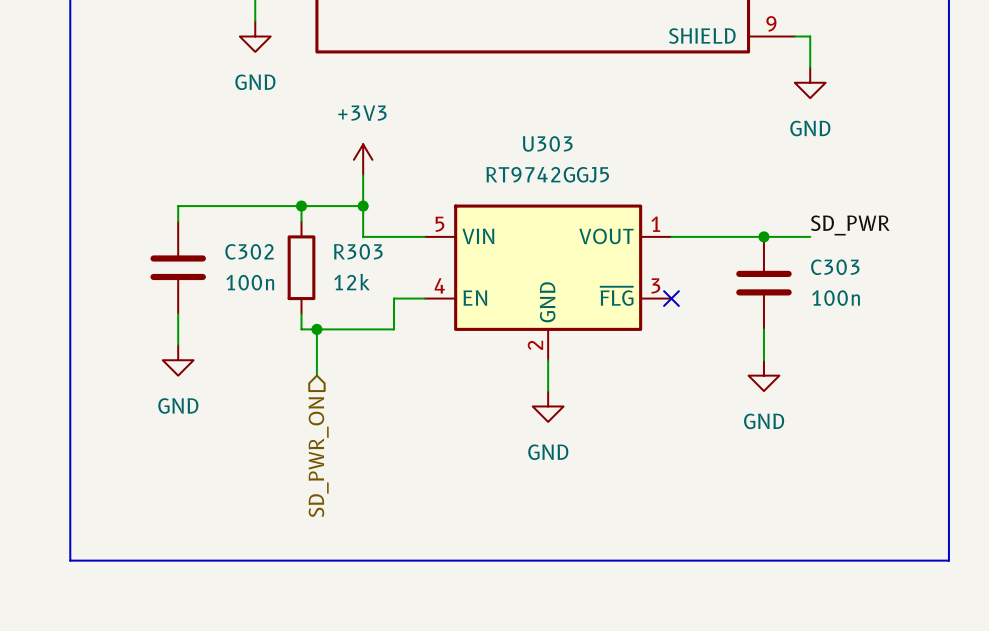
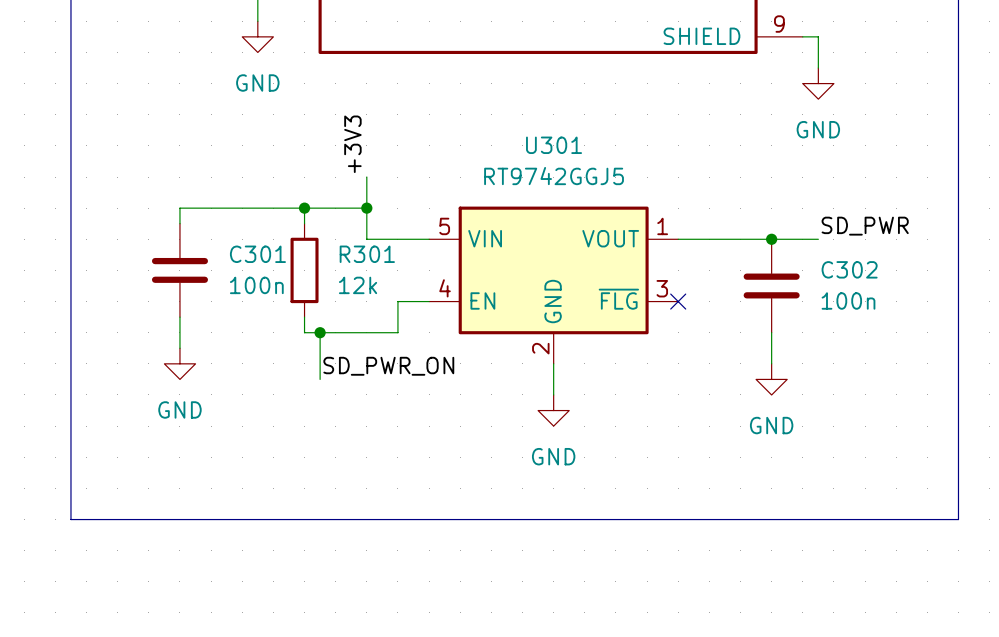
U303 name: U303 (547, 143) -> U301 (554, 145)
label: none -> +3V3 (352, 144)
power symbol: +3V3 (363, 159) -> none
C302 name: C302 (249, 251) -> C301 (257, 254)
R303 name: R303 (358, 251) -> R301 (367, 254)
C303 name: C303 (835, 267) -> C302 (849, 269)
label: none -> SD_PWR_ON (388, 366)
hierarchical label: SD_PWR_ON (318, 457) -> none
line: (70, 514) (70, 560) (948, 560) (948, 514) -> (70, 519) (958, 519)

